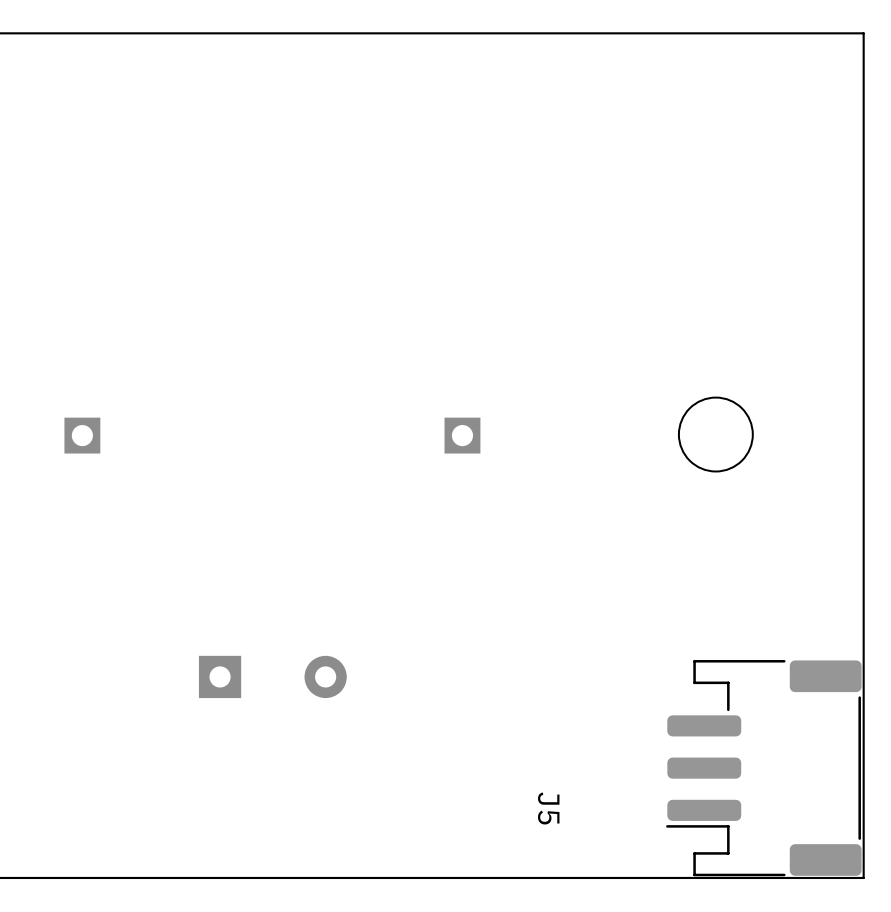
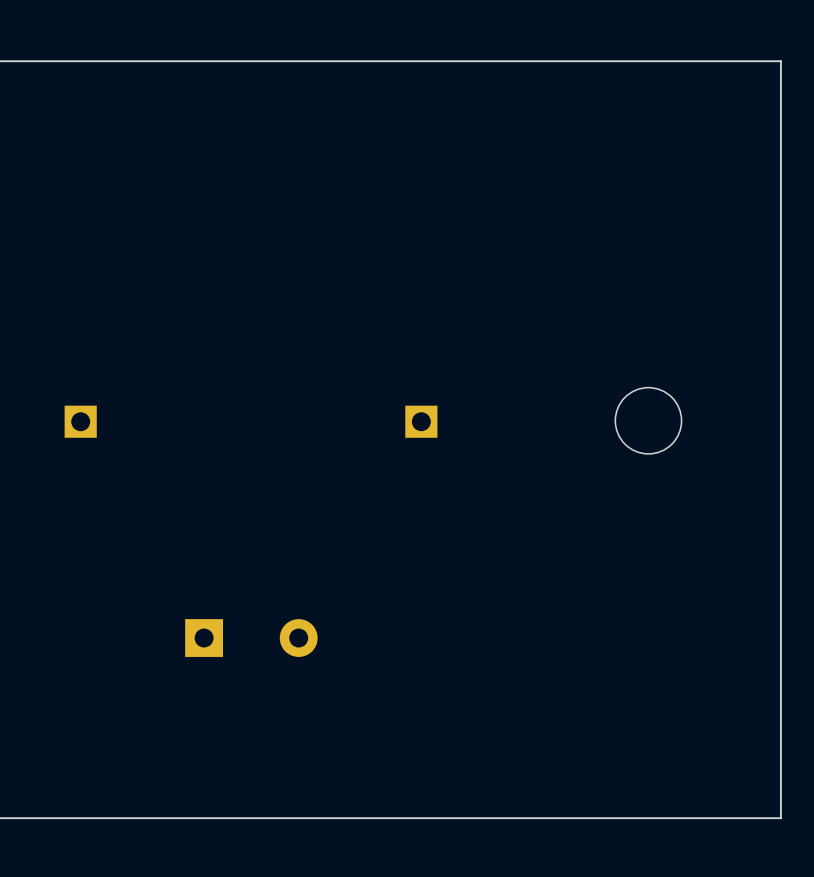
J5: (763, 768) -> none

